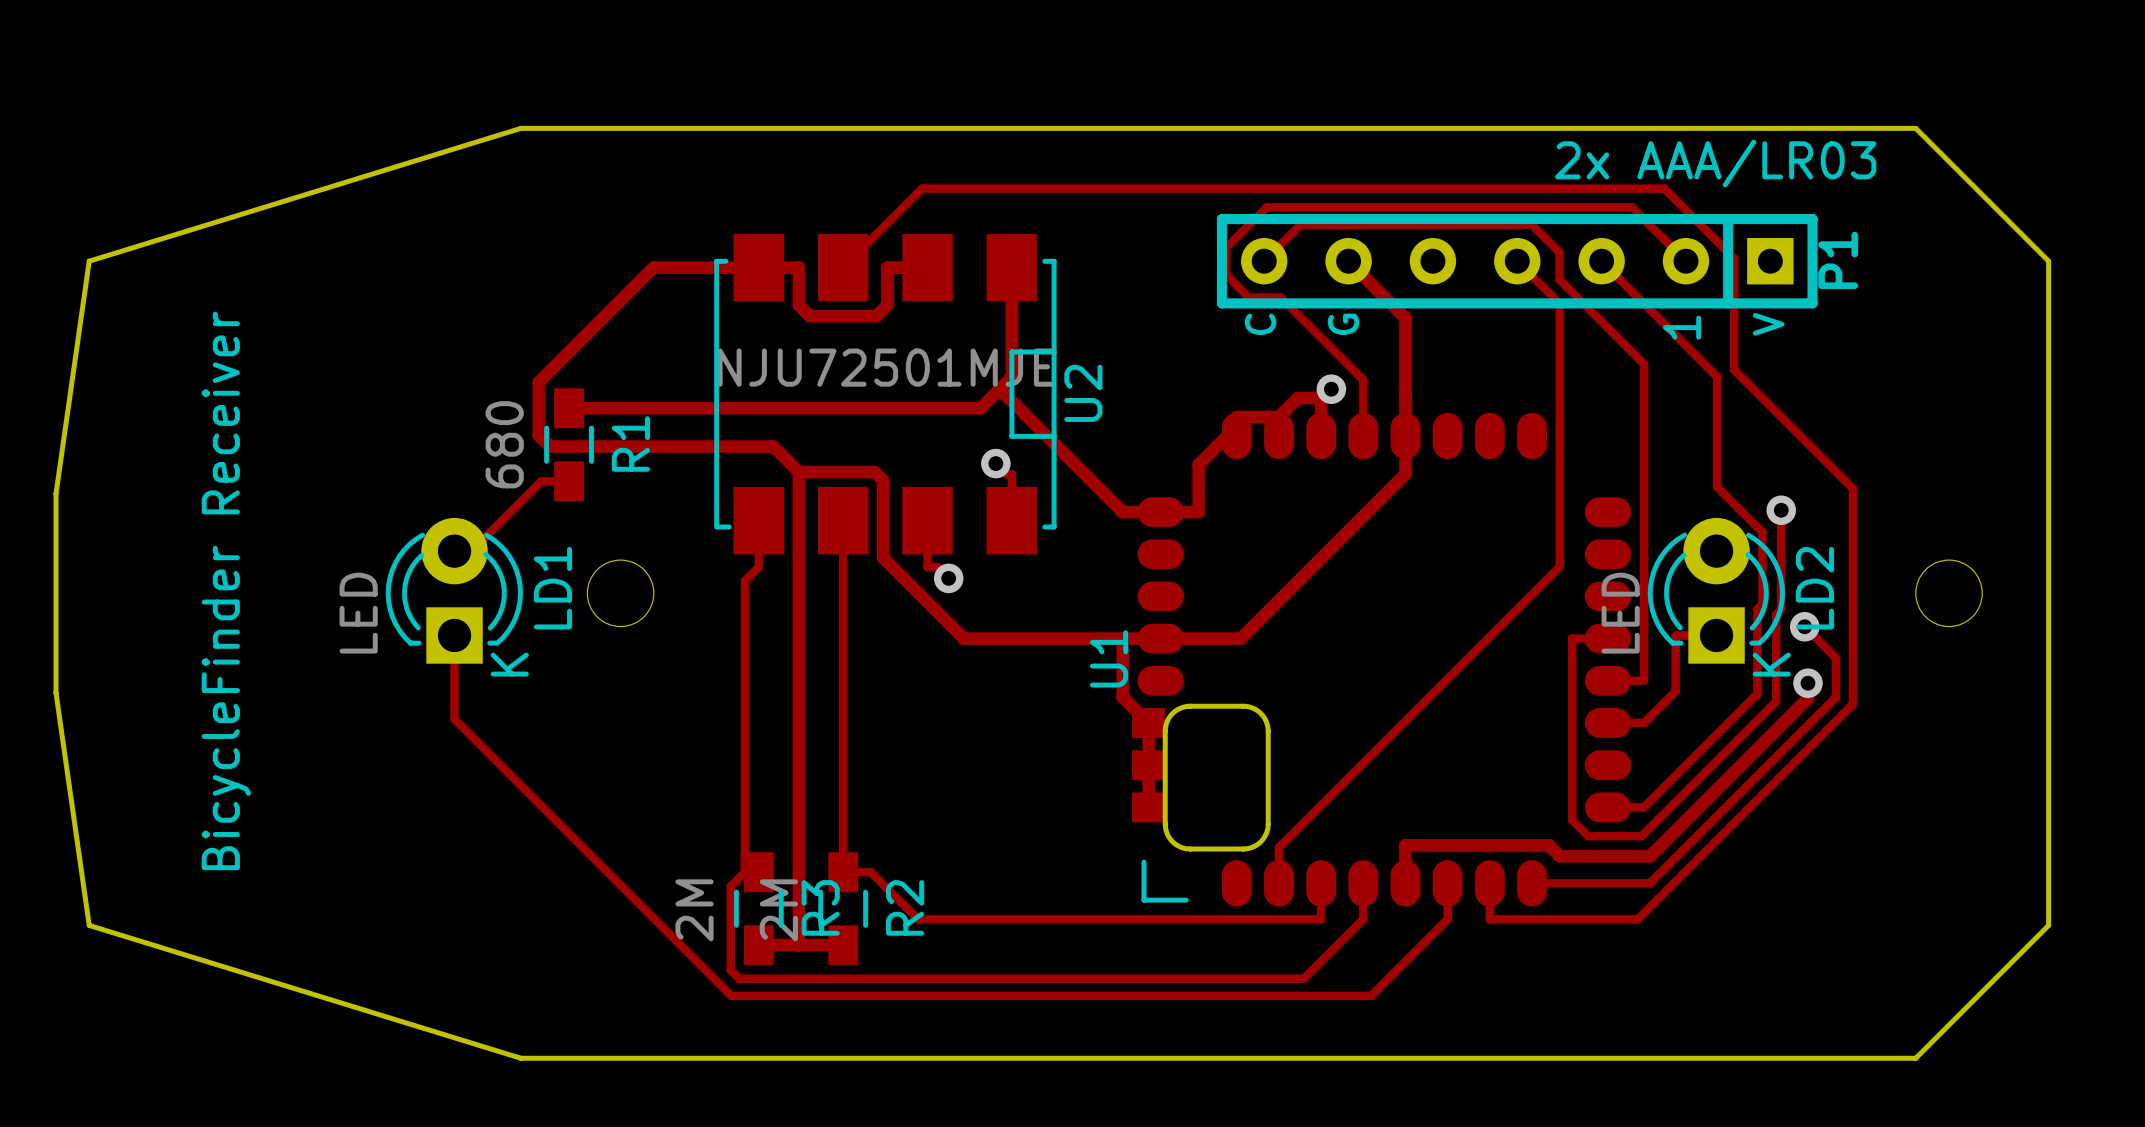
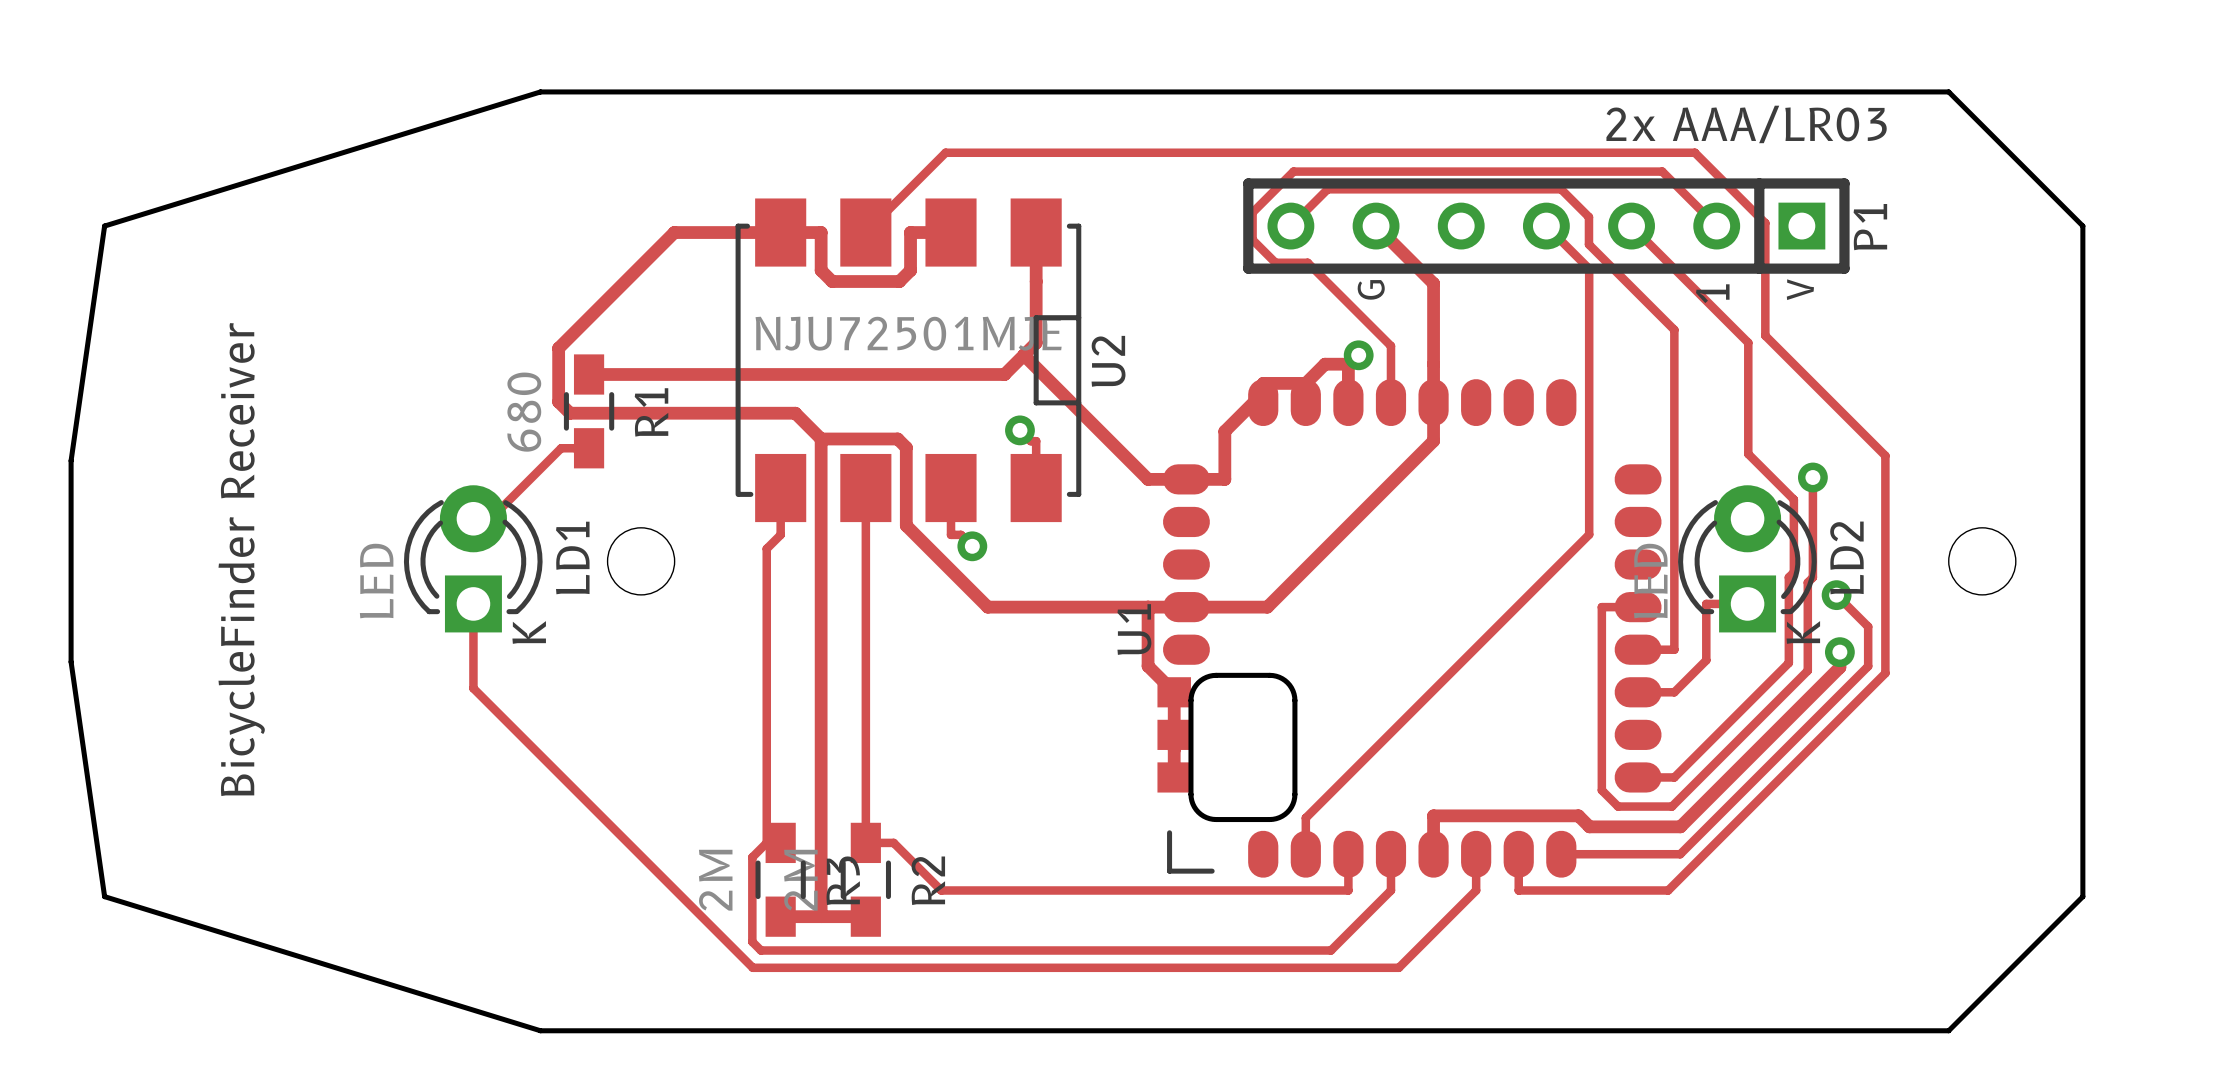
P1 footprint: [1216, 213, 1818, 309] -> [1243, 178, 1850, 274]

